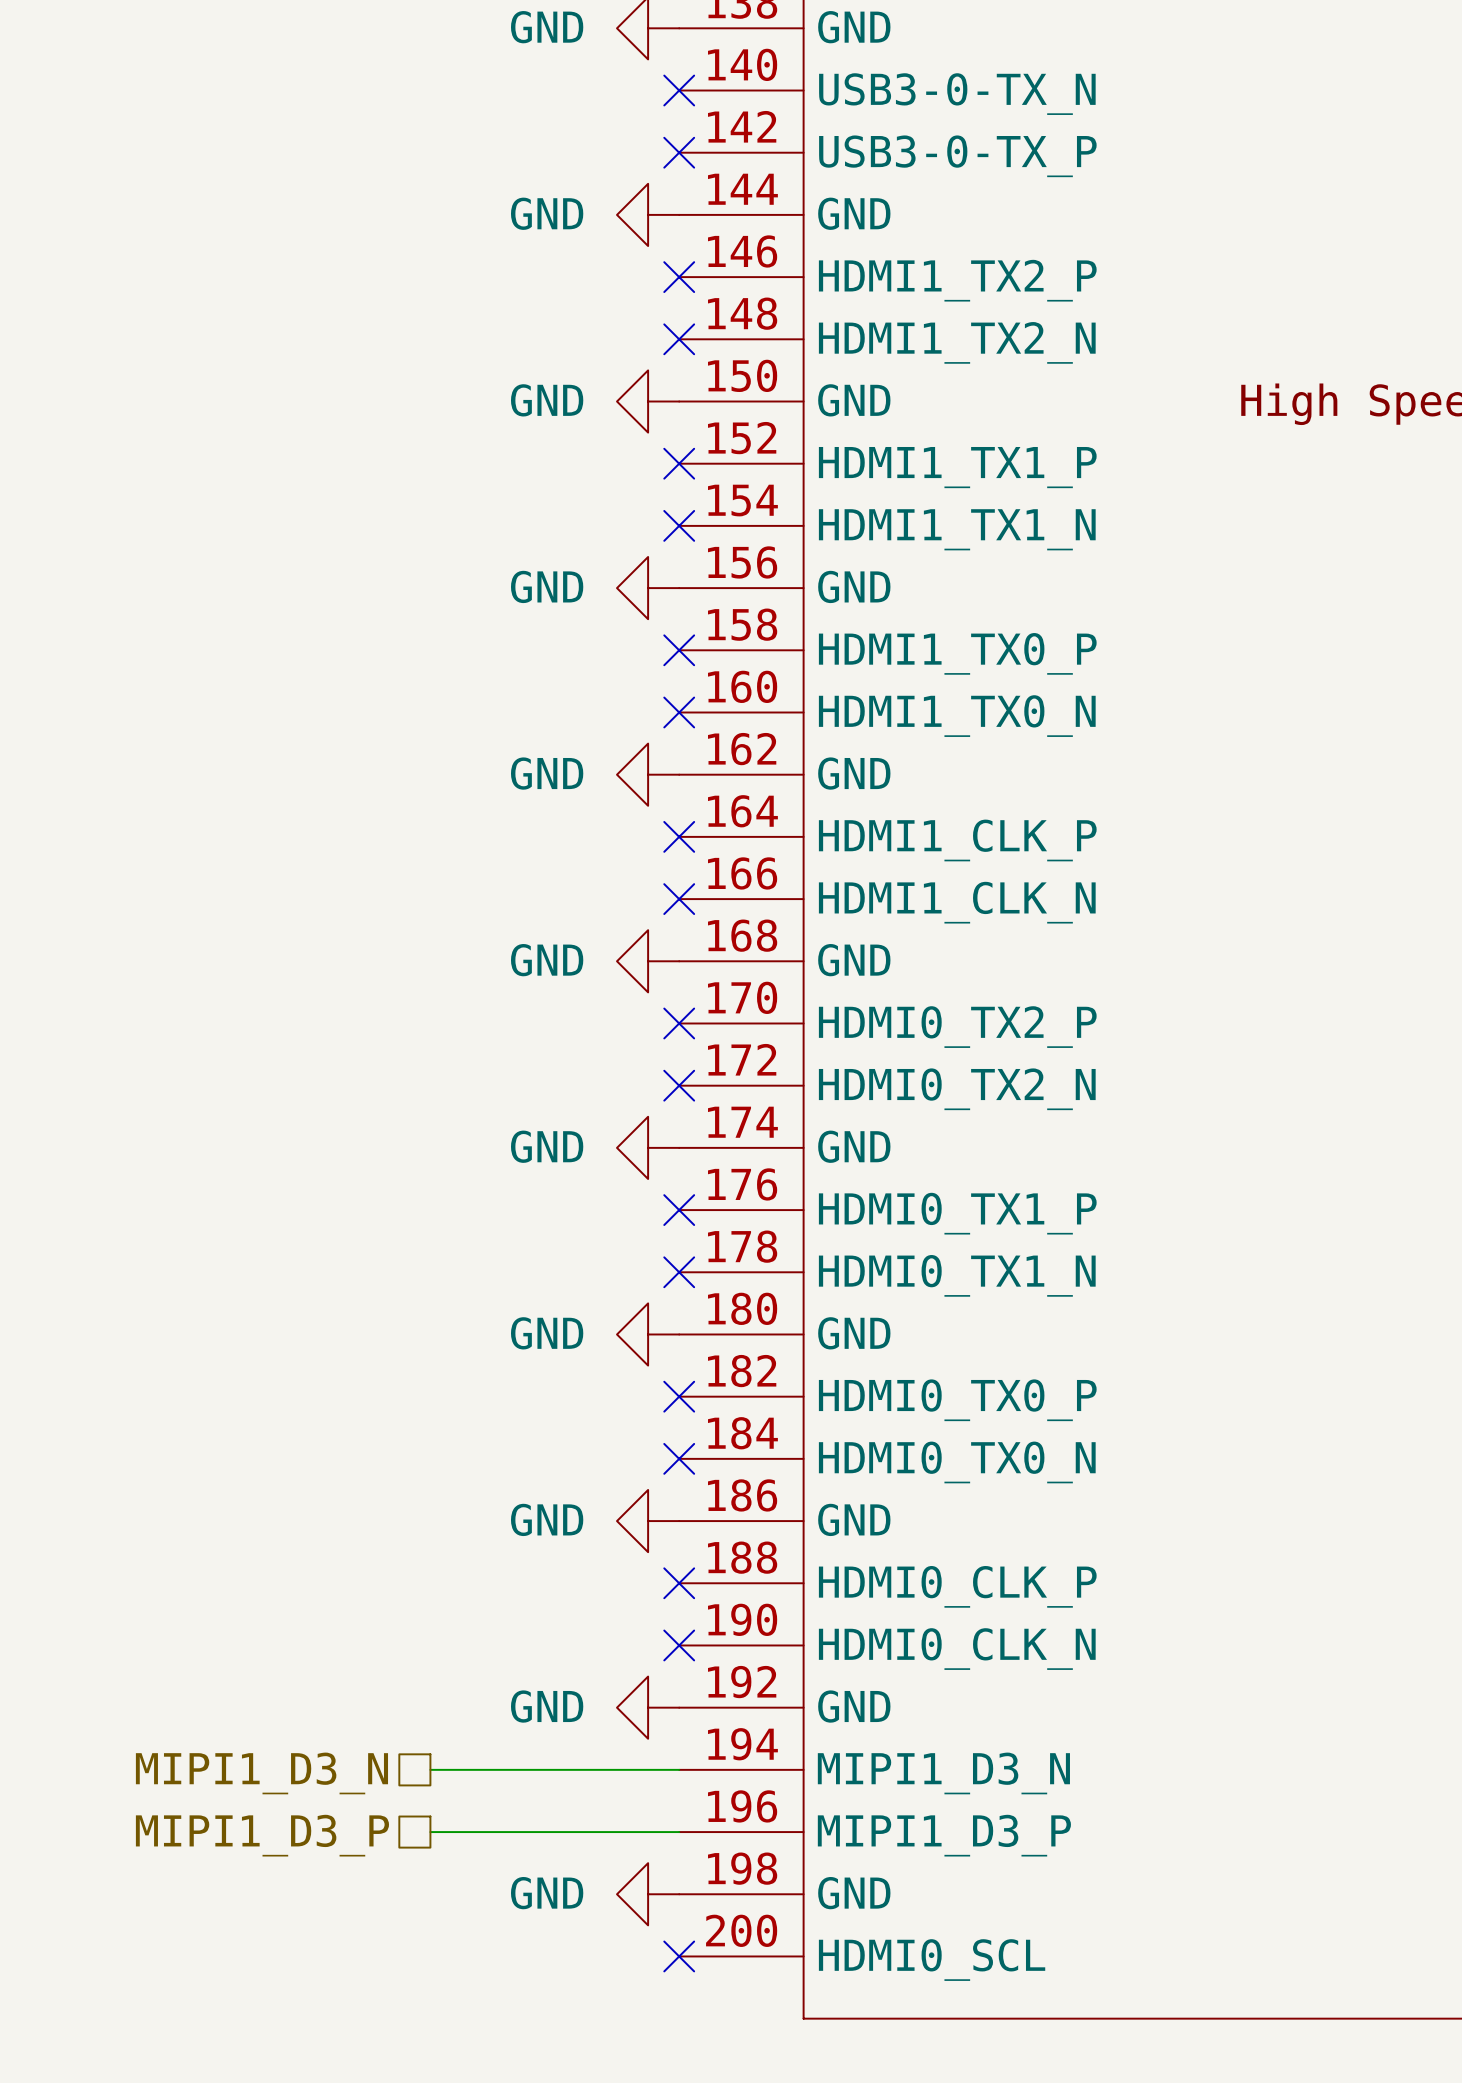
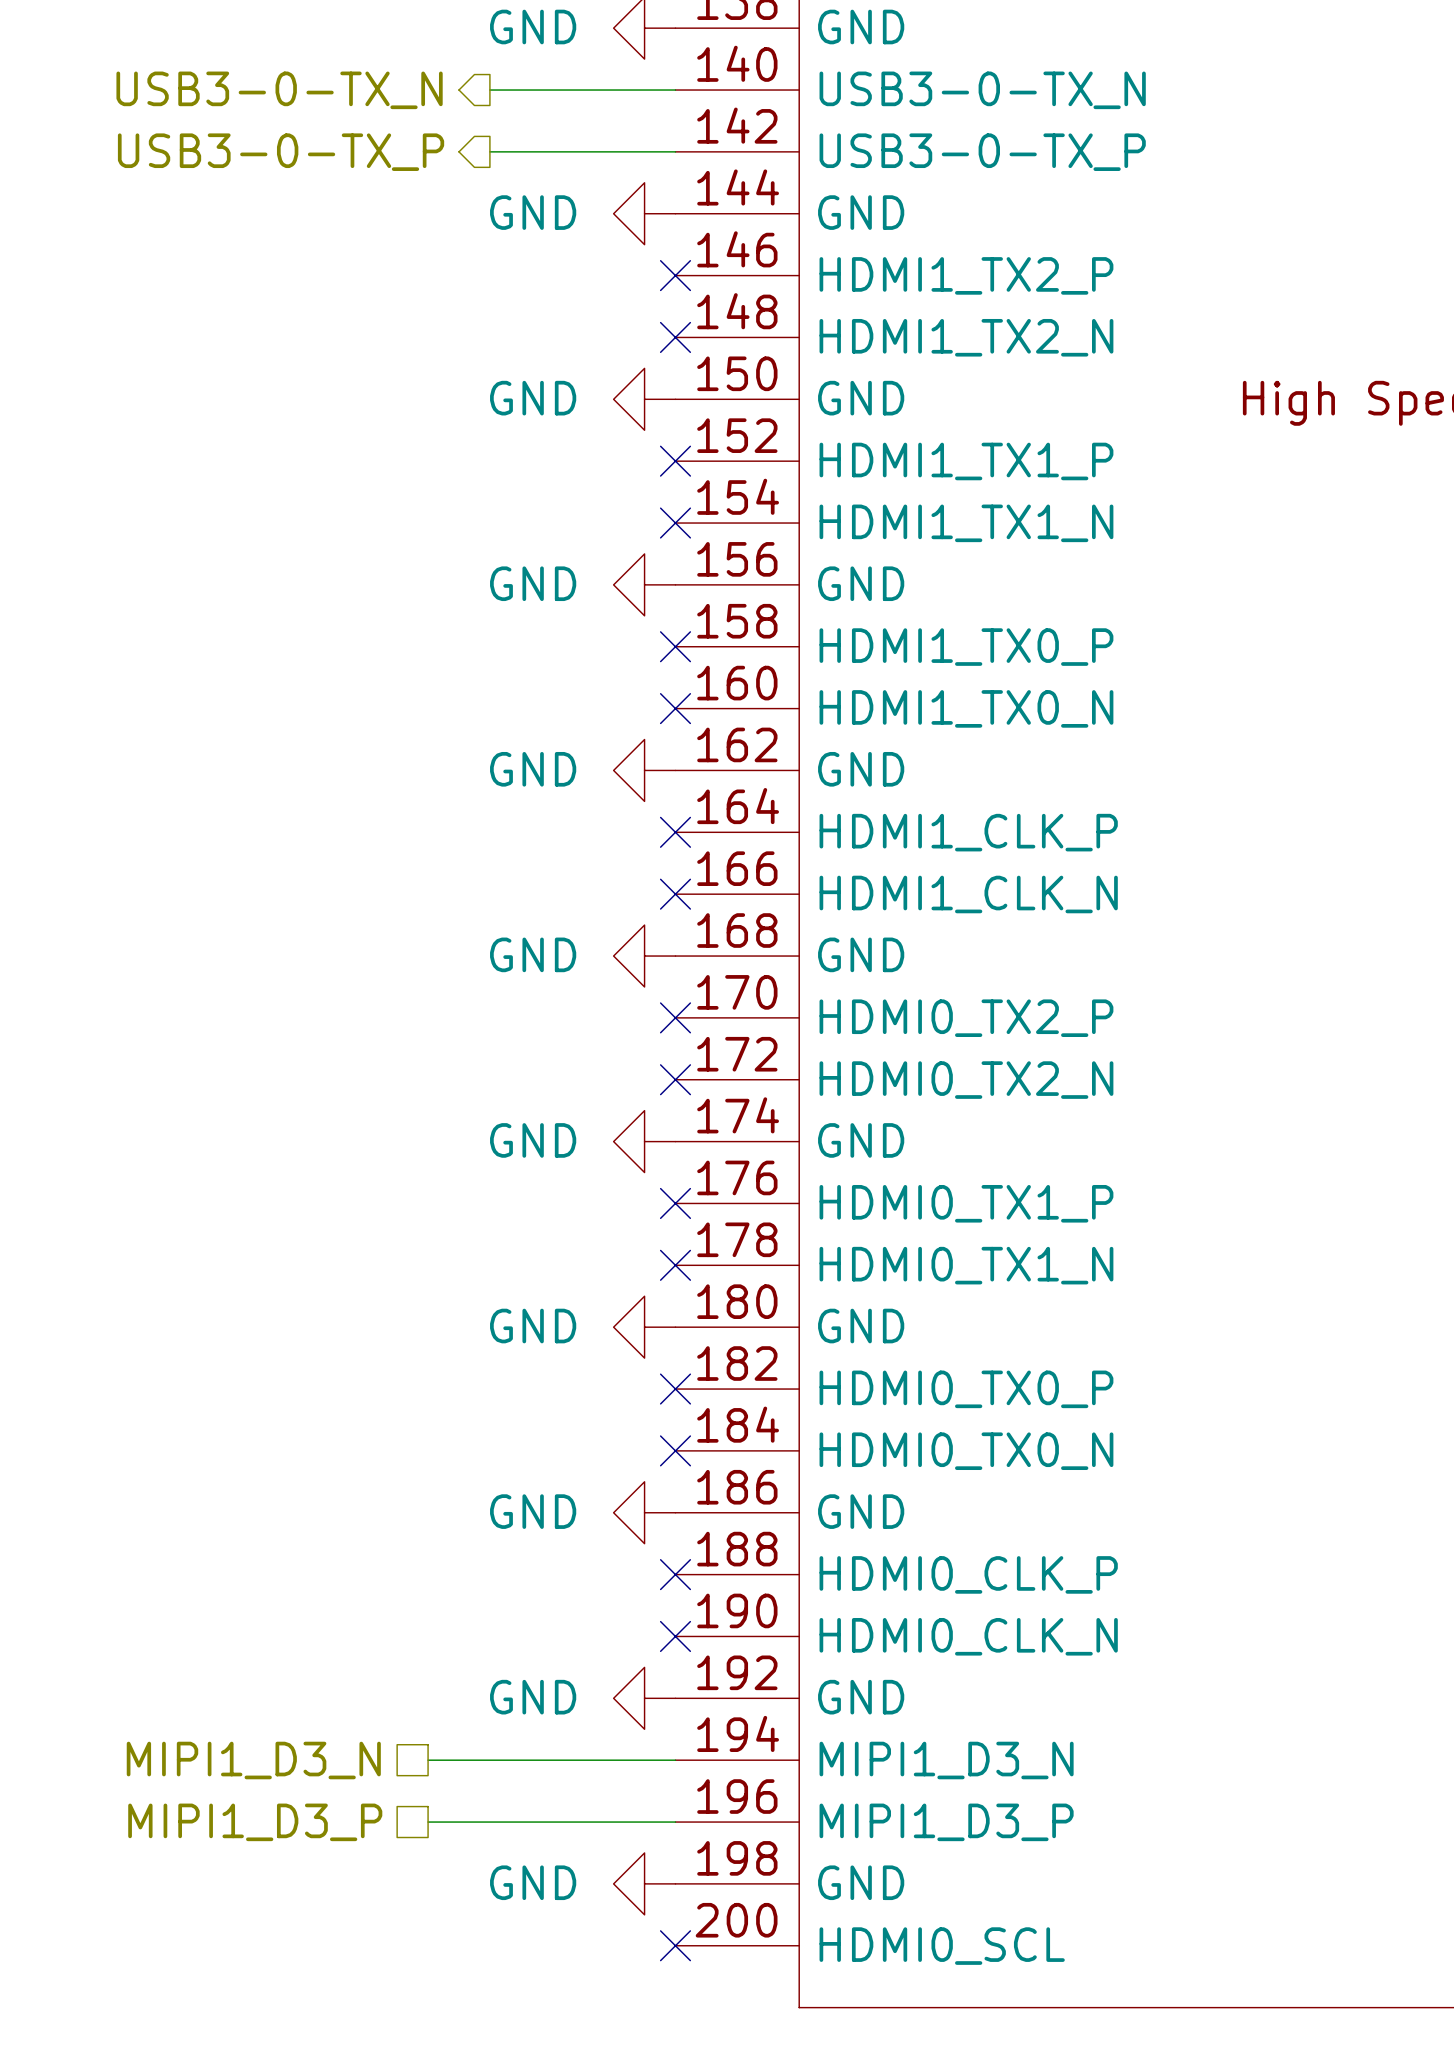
wire: none -> (489, 90) (675, 90)
no-connect mark: (679, 90) -> none
hierarchical label: none -> USB3-0-TX_N (279, 90)
wire: none -> (489, 151) (675, 151)
no-connect mark: (679, 152) -> none
hierarchical label: none -> USB3-0-TX_P (281, 152)

